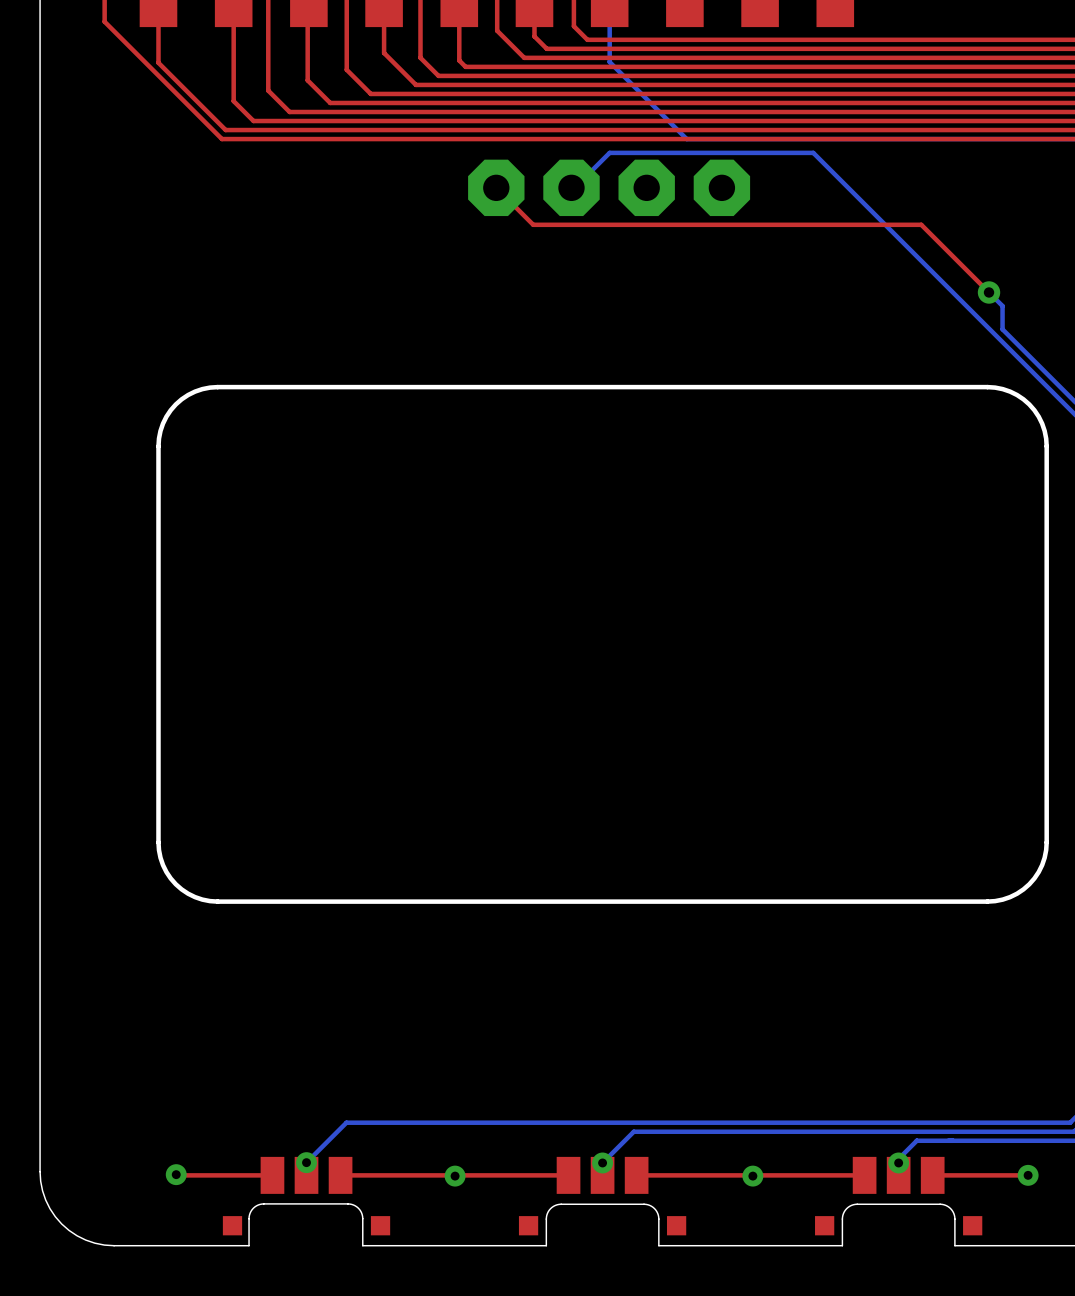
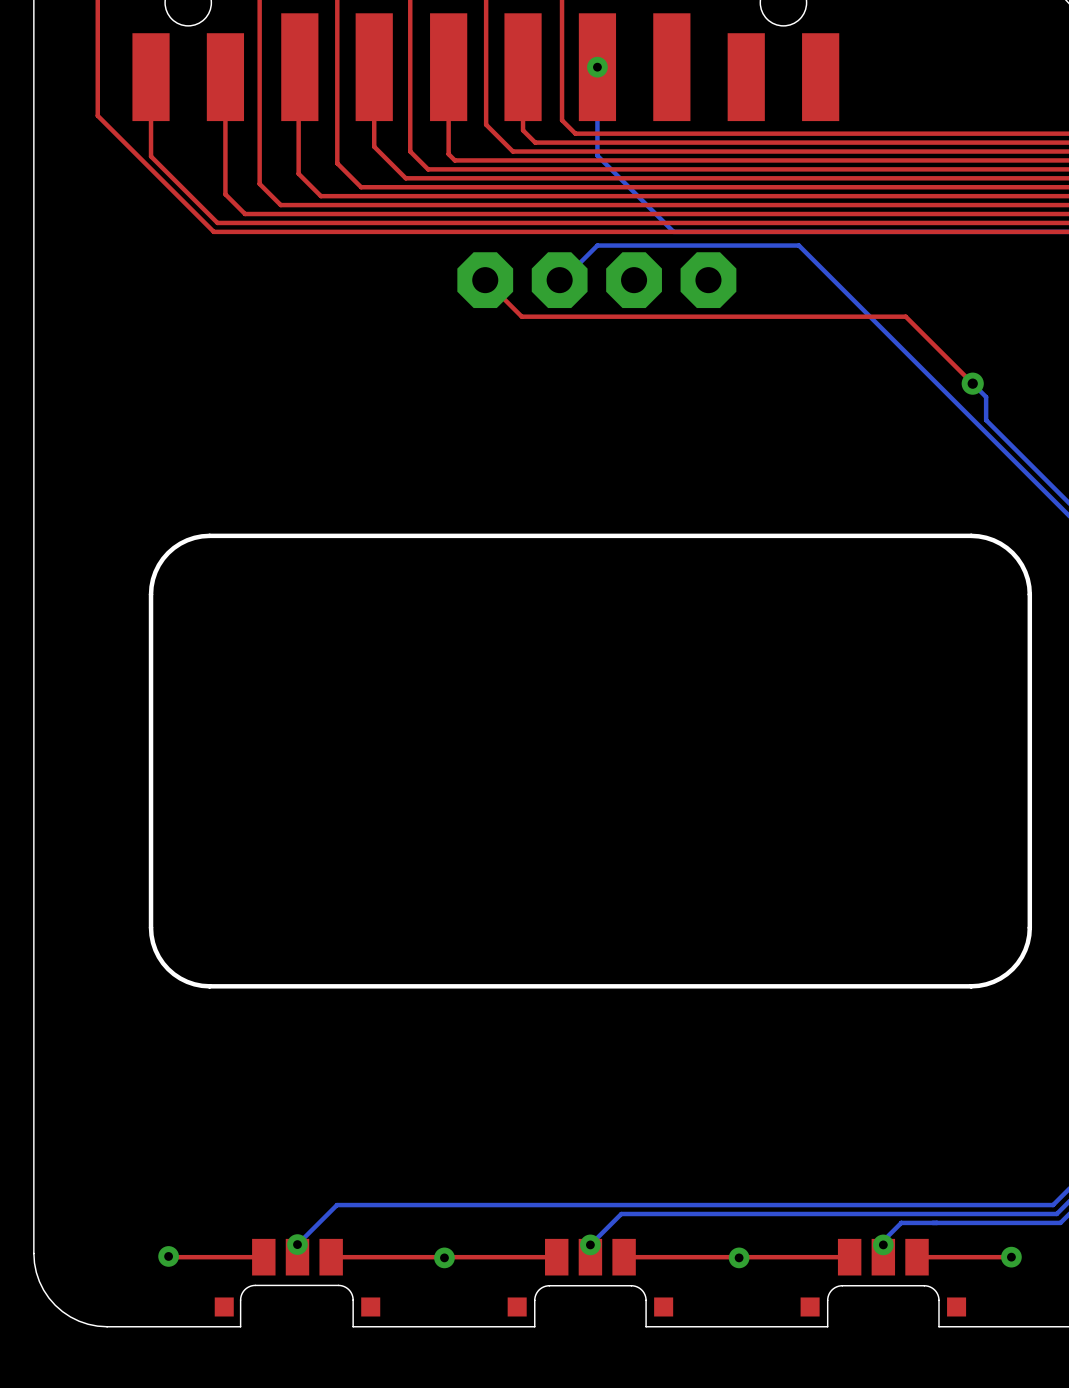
board edge: (158, 505) (158, 438) (166, 416) (175, 404) (188, 395) (202, 389) (217, 387) (995, 387) (1010, 391) (1023, 399) (1034, 410) (1042, 423) (1046, 446) (1046, 505) -> (151, 594) (155, 572) (168, 553) (187, 540) (209, 535) (978, 536) (1000, 543) (1017, 558) (1025, 572) (1029, 594)

